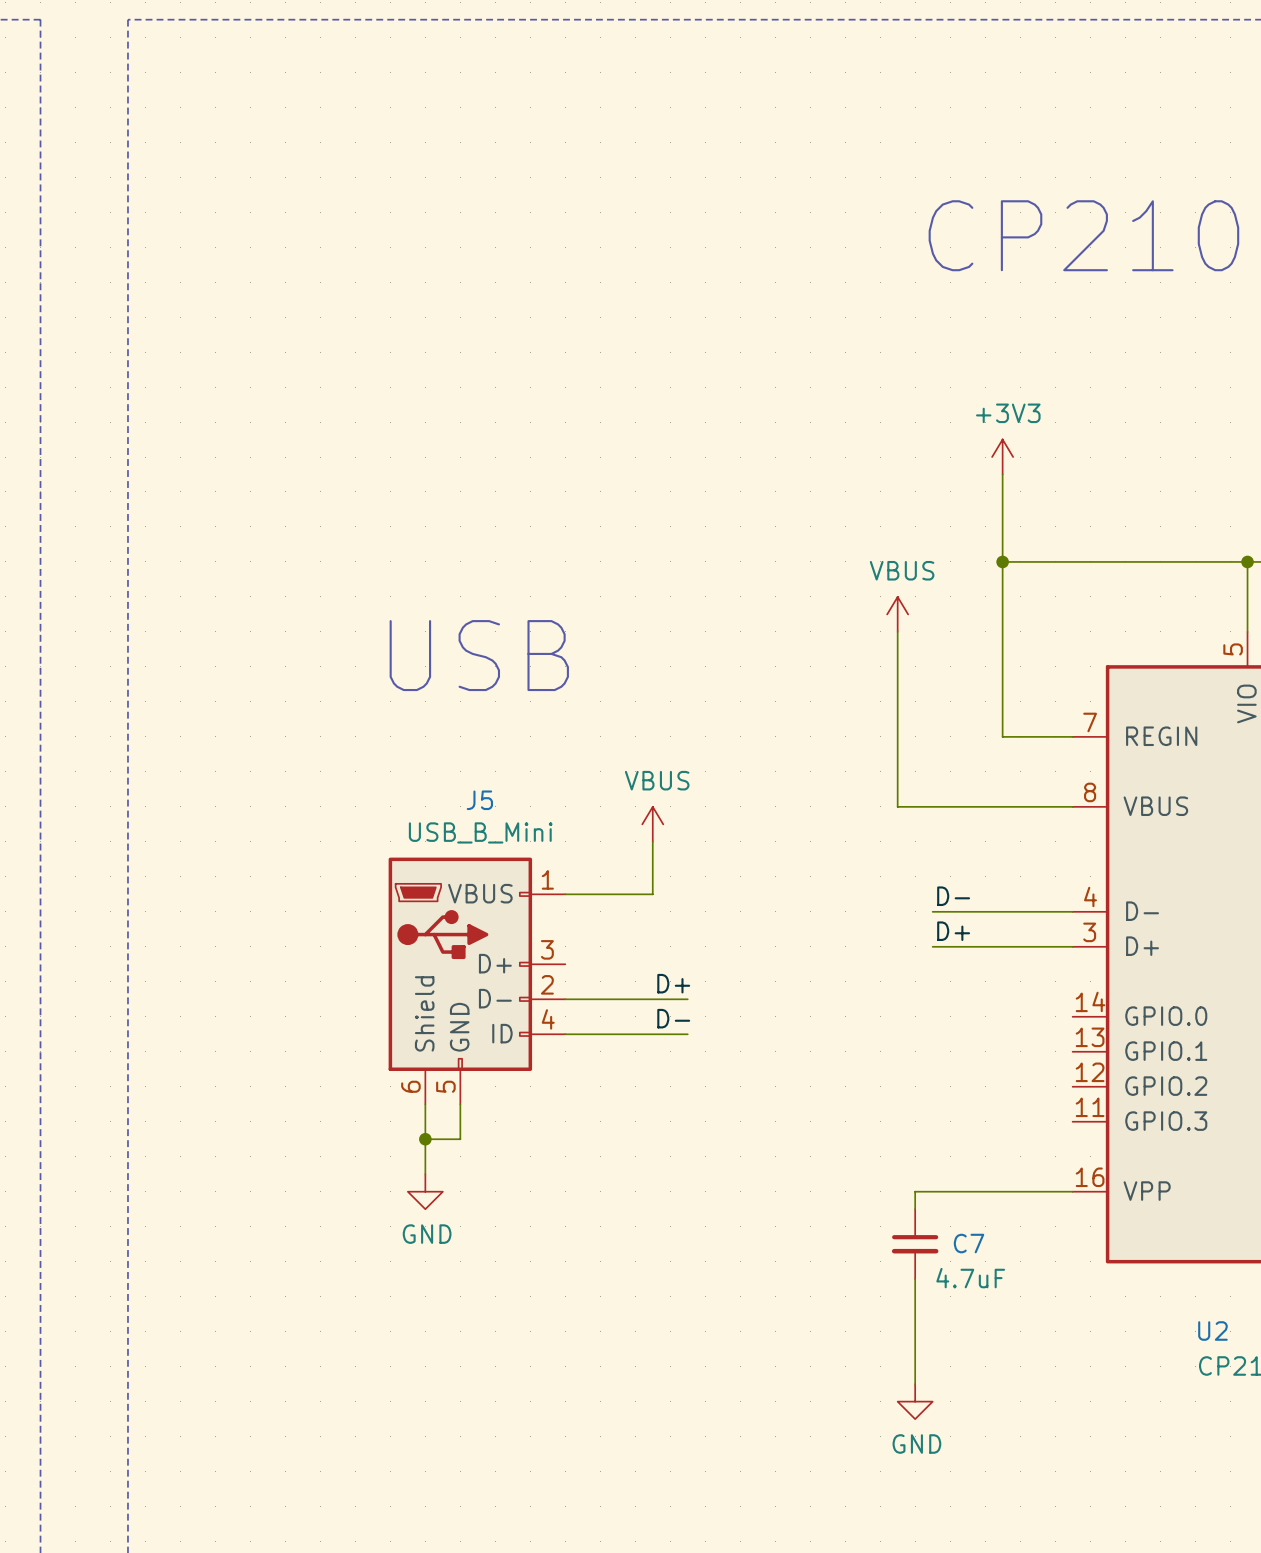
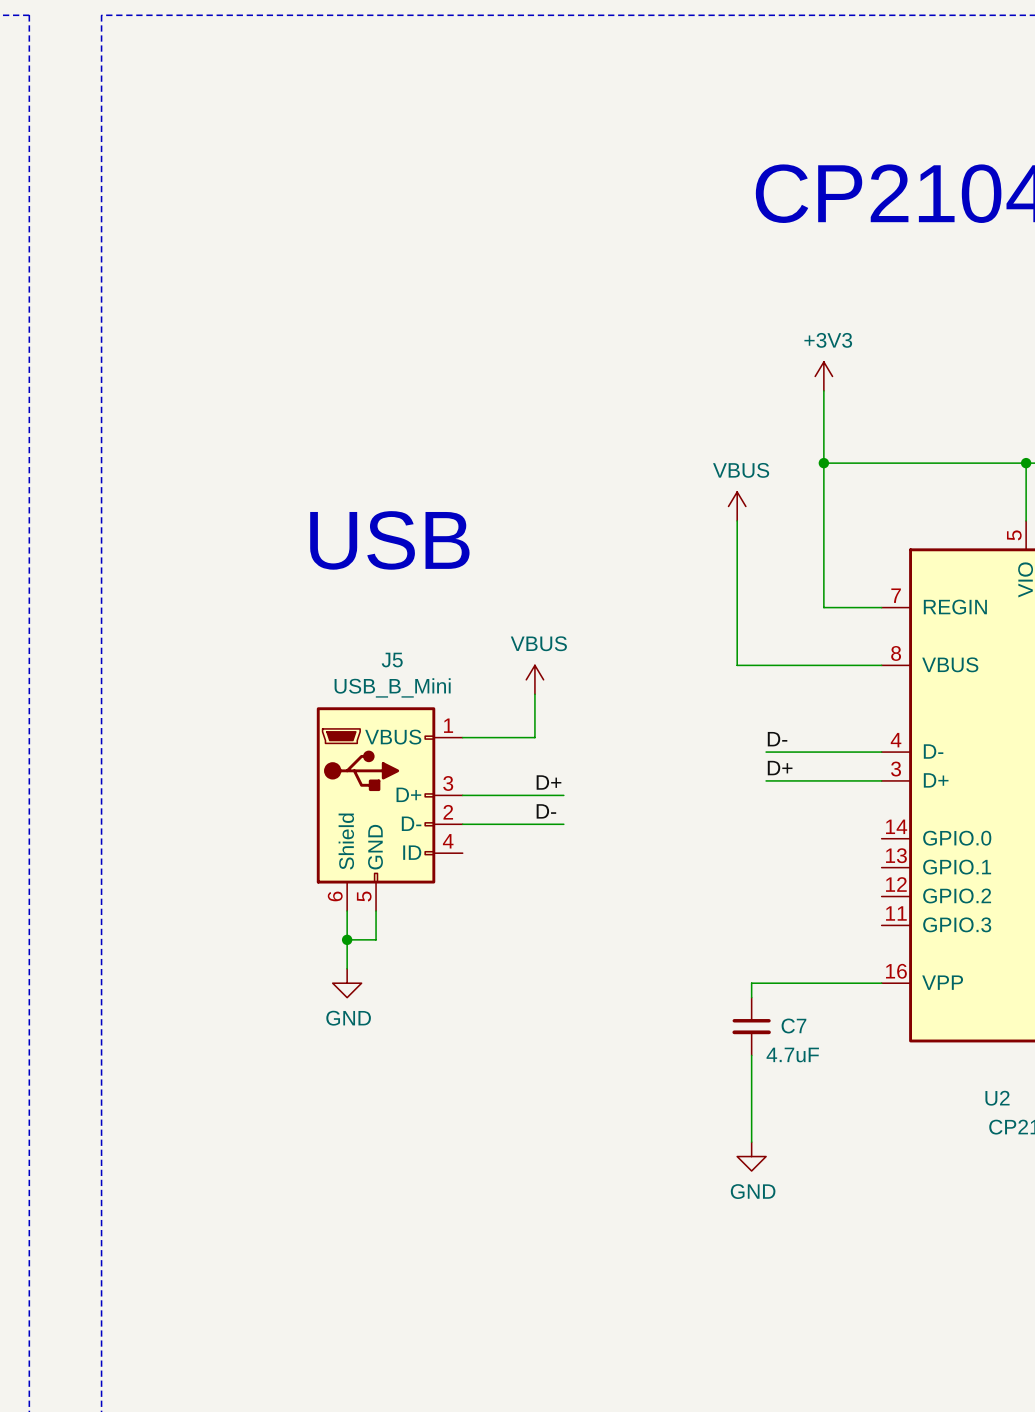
label: none -> D+ (549, 782)
label: D+ (673, 983) -> D- (546, 811)
label: D- (673, 1018) -> none
wire: (565, 1034) (687, 1034) -> (462, 795) (563, 795)

